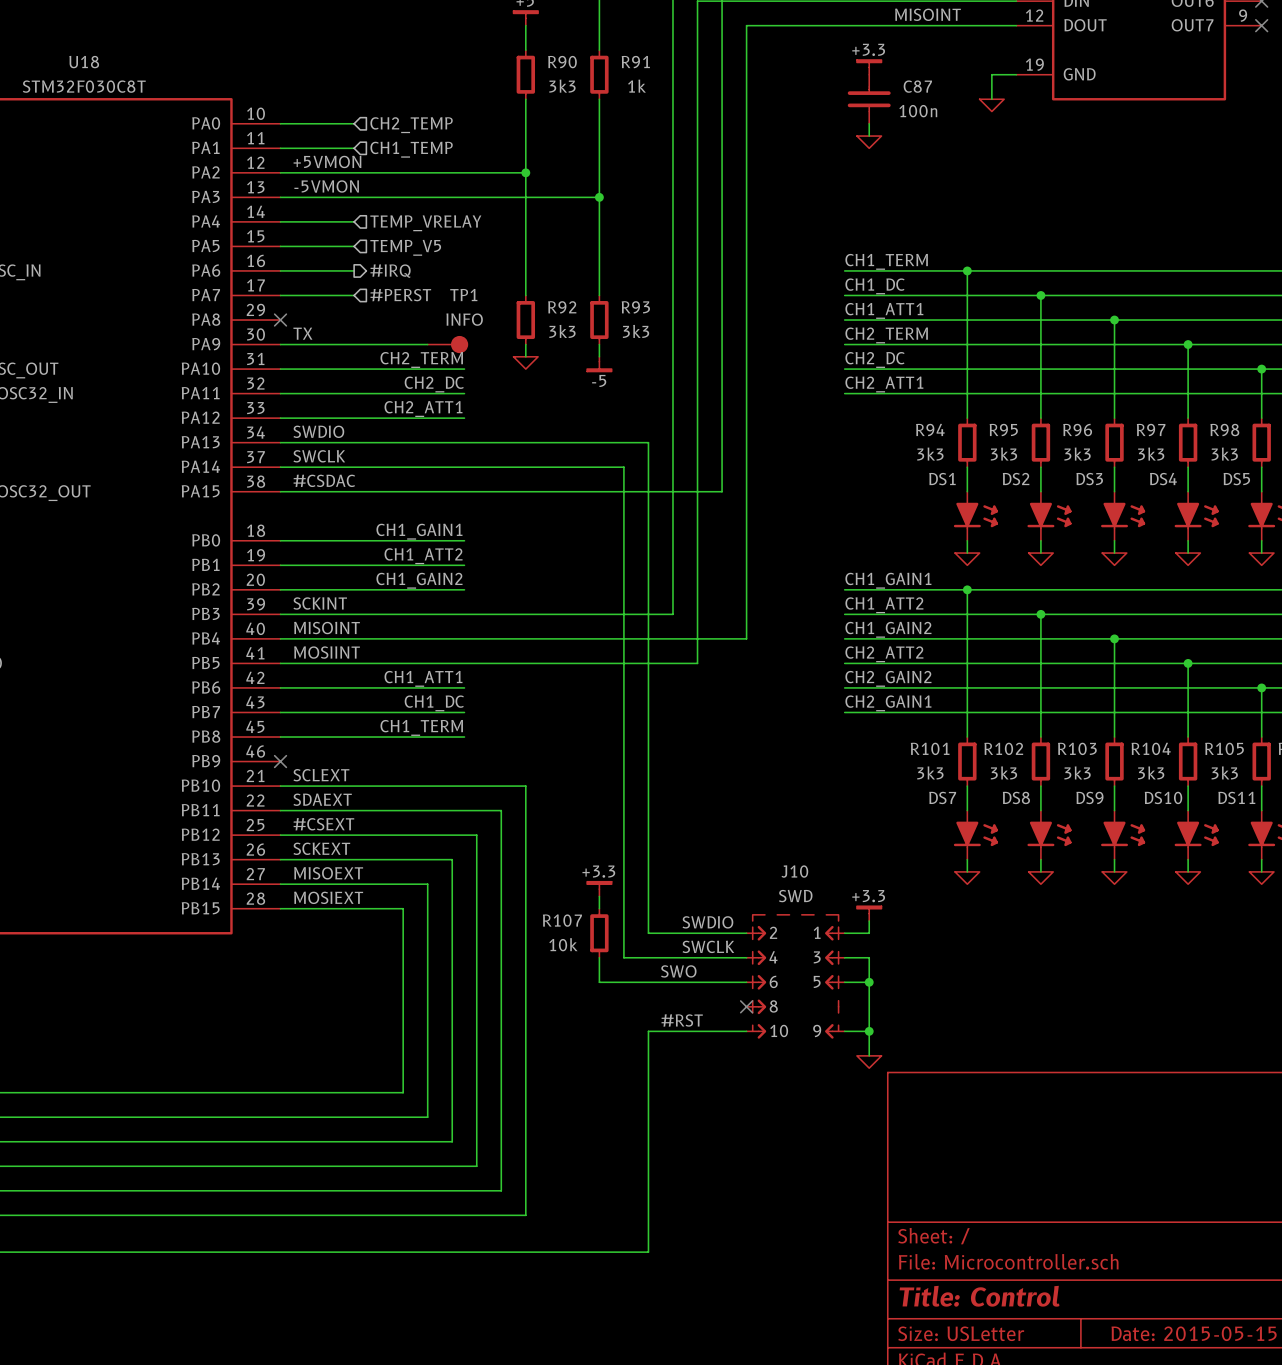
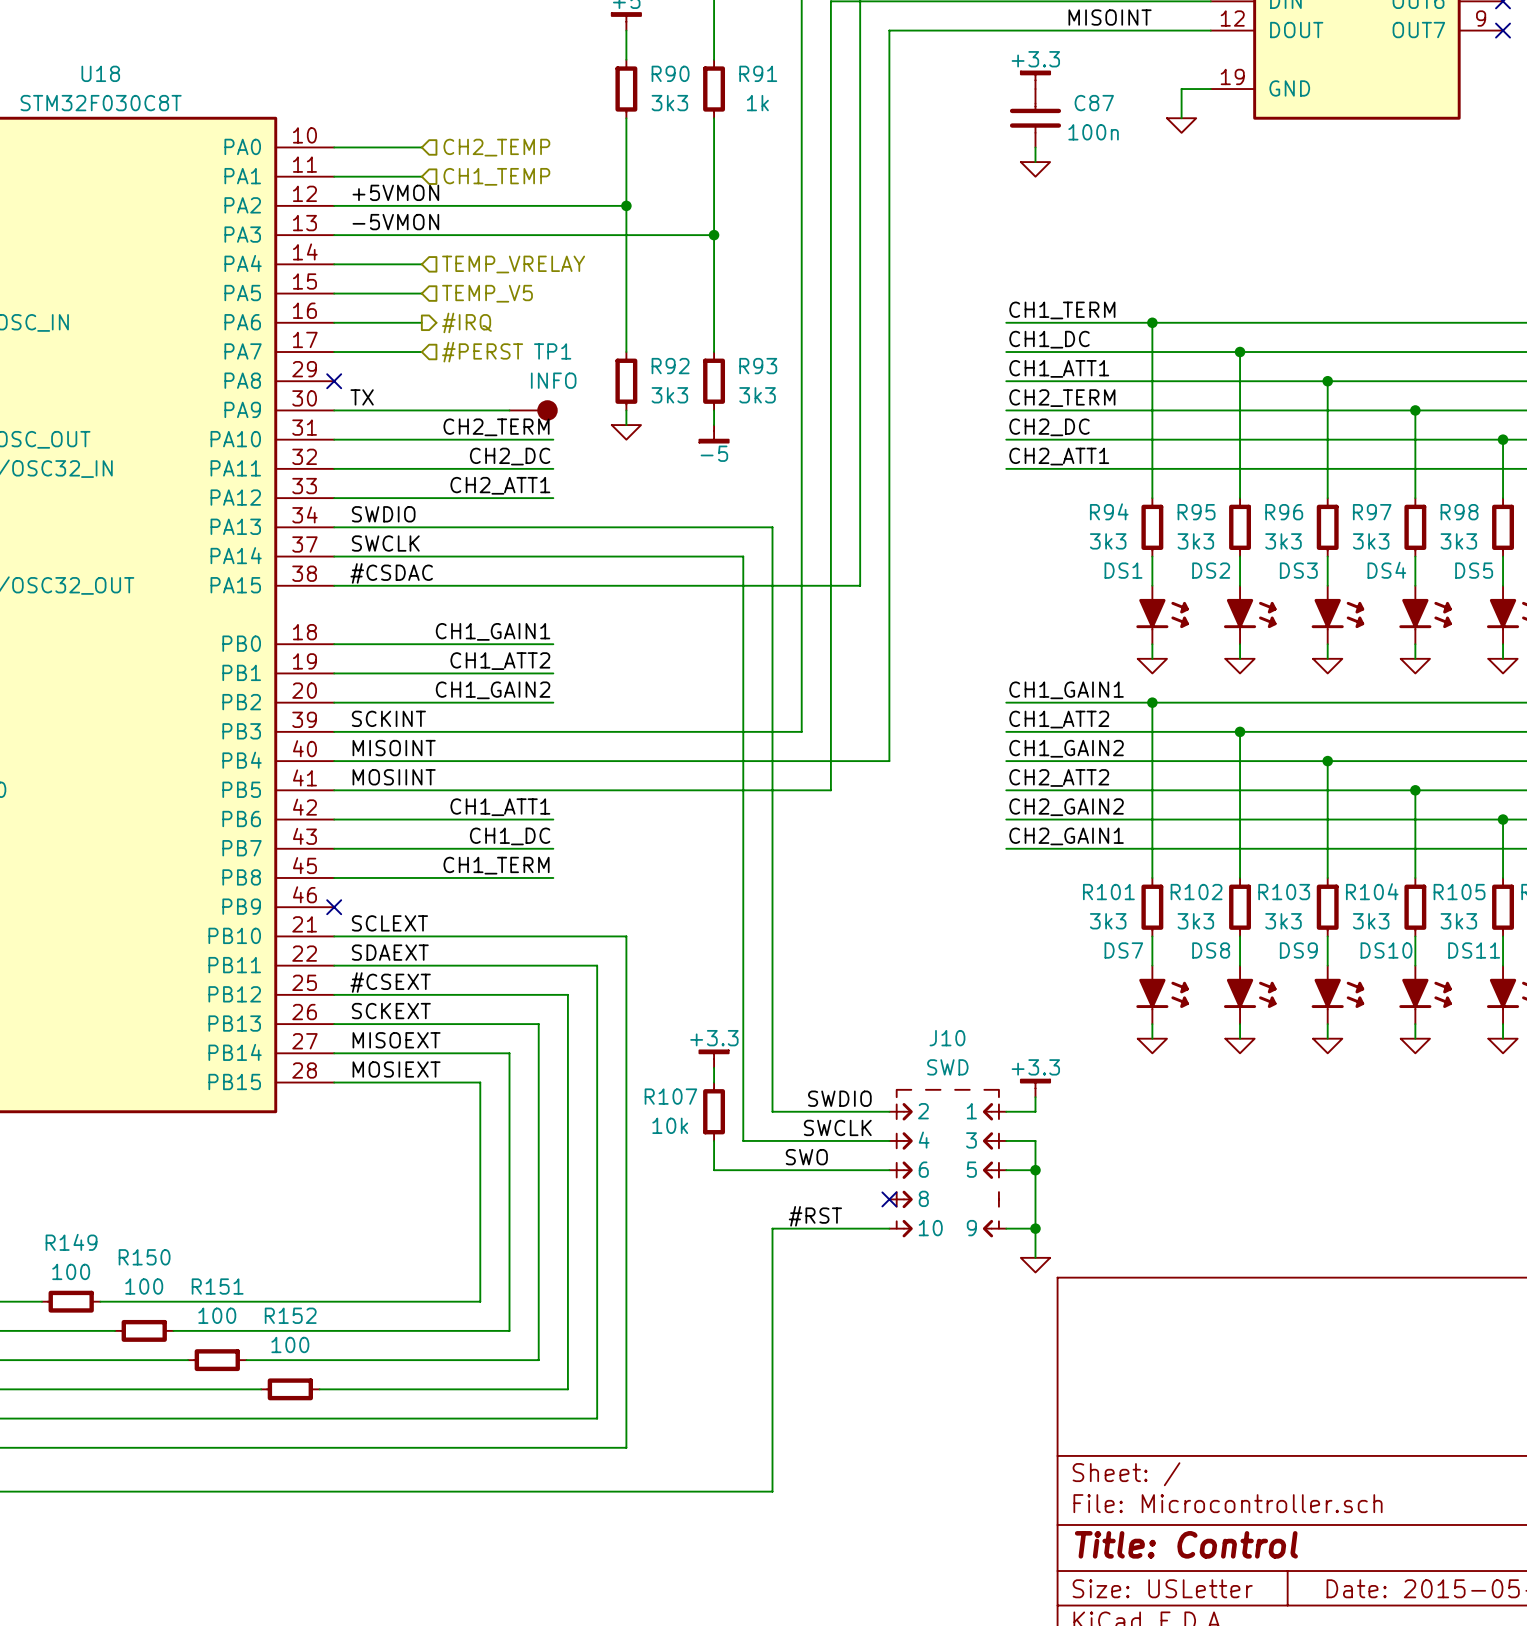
wire: (35, 1092) (84, 1092) -> none
R149: none -> 100 (71, 1301)
wire: (96, 1117) (145, 1117) -> none
R150: none -> 100 (144, 1330)
wire: (157, 1141) (206, 1141) -> none
R151: none -> 100 (217, 1360)
wire: (219, 1166) (268, 1166) -> none
R152: none -> 100 (290, 1389)

